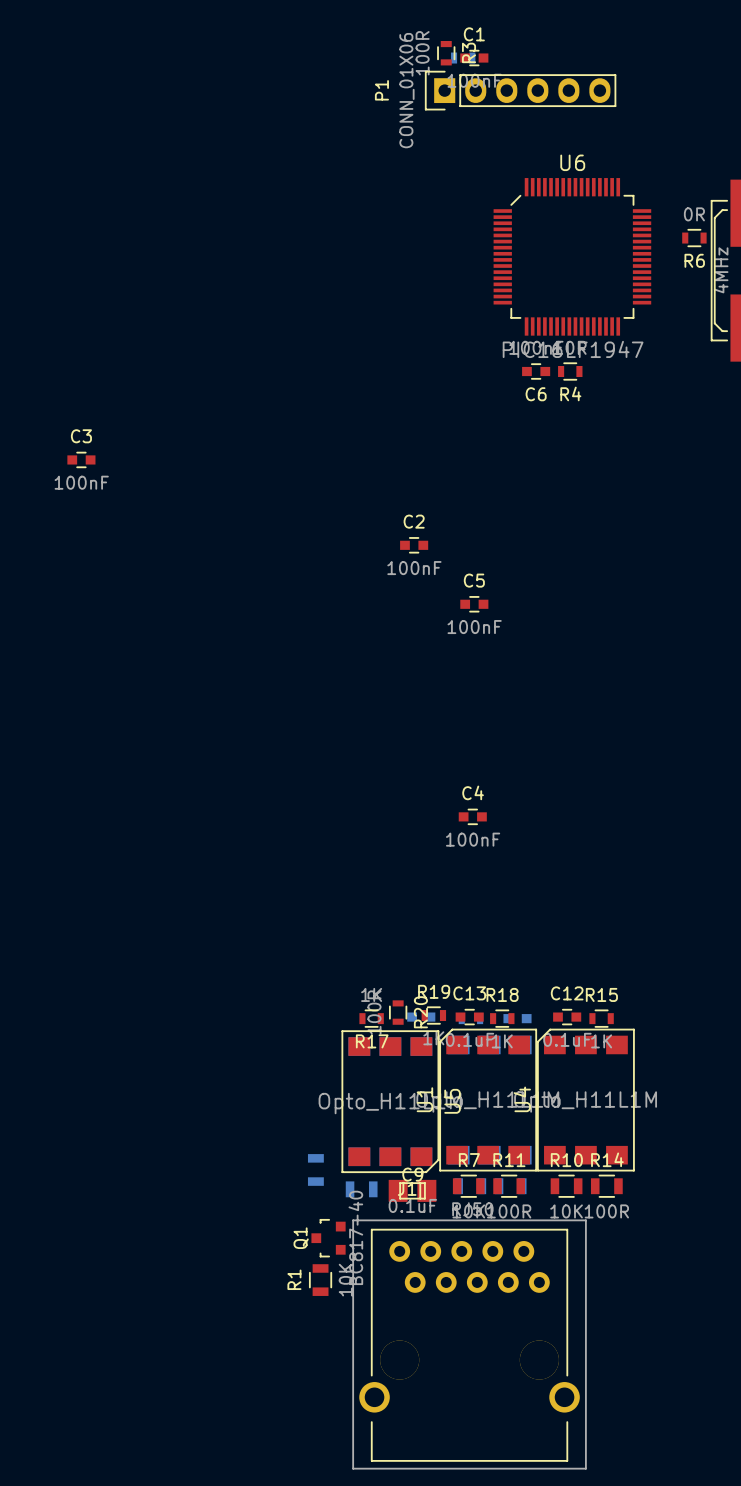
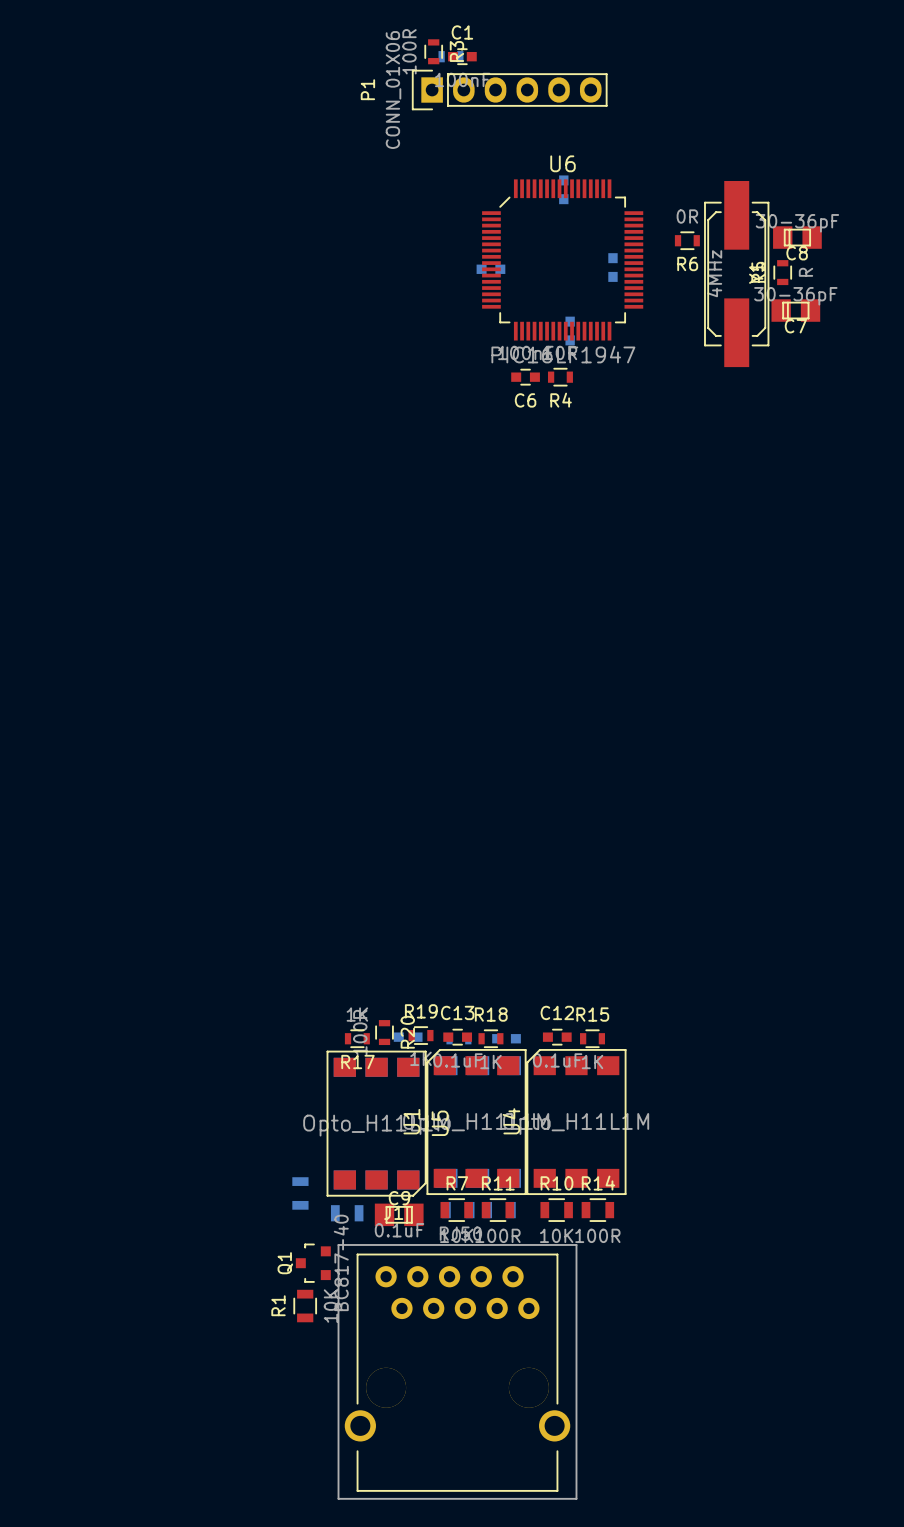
part: none -> (563, 189)
part: none -> (612, 267)
part: none -> (490, 269)
C3: 100nF (81, 459) -> none
C2 side: top (414, 545) -> bottom (570, 331)
C5: 100nF (474, 604) -> none
C4: 100nF (472, 816) -> none

